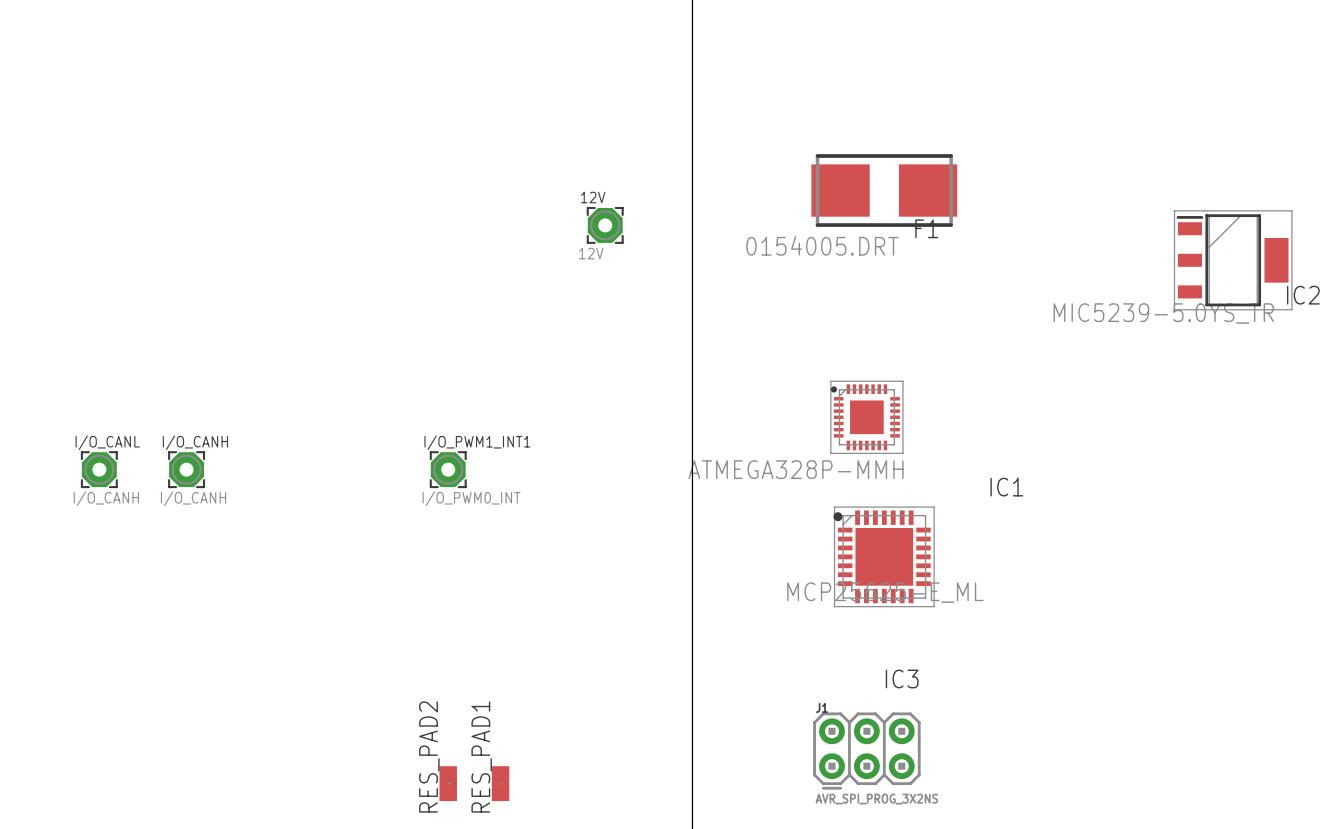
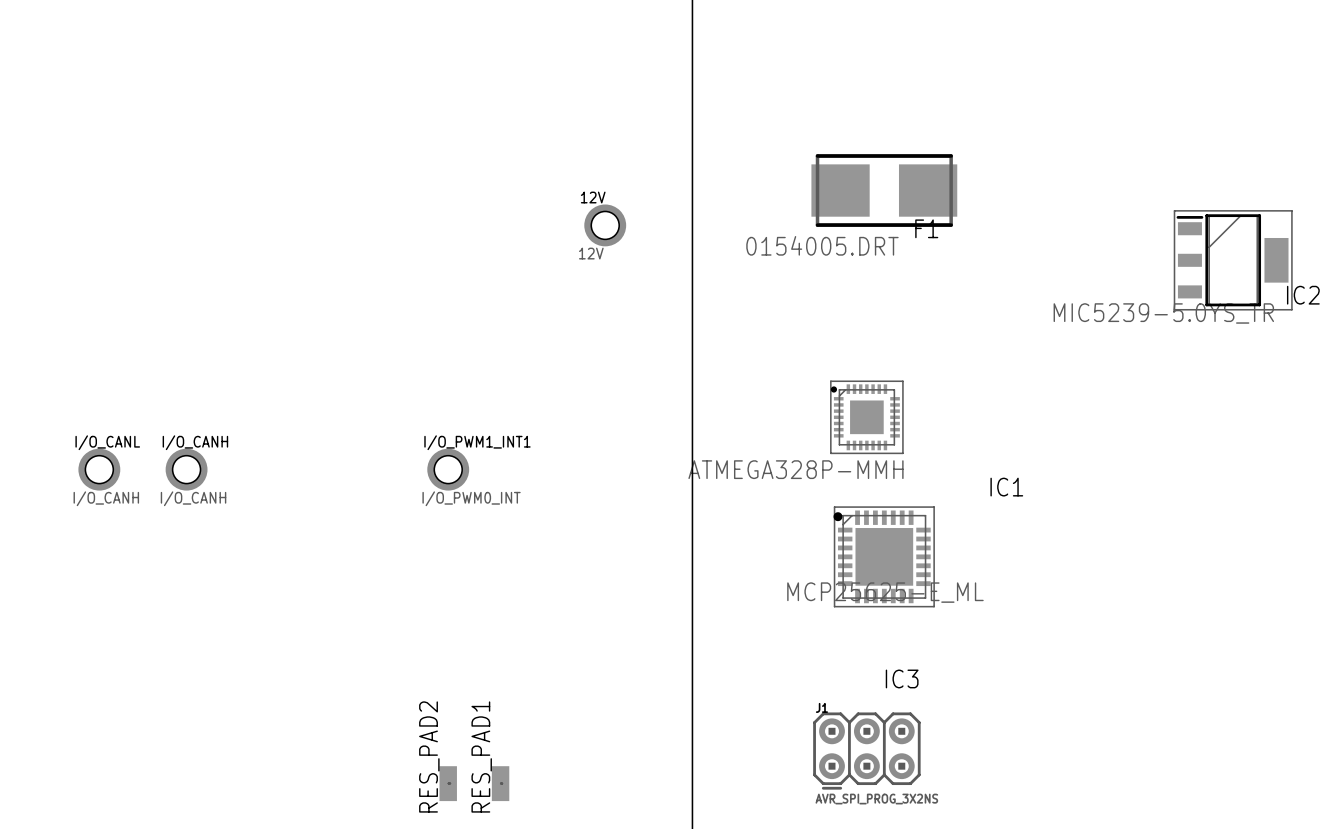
12V footprint: [586, 206, 624, 244] -> [584, 204, 627, 247]
I/O_CANL footprint: [80, 451, 118, 489] -> [78, 448, 121, 491]
I/O_CANH footprint: [168, 451, 206, 489] -> [165, 448, 208, 491]
I/O_PWM1_INT1 footprint: [429, 451, 467, 489] -> [427, 448, 470, 491]

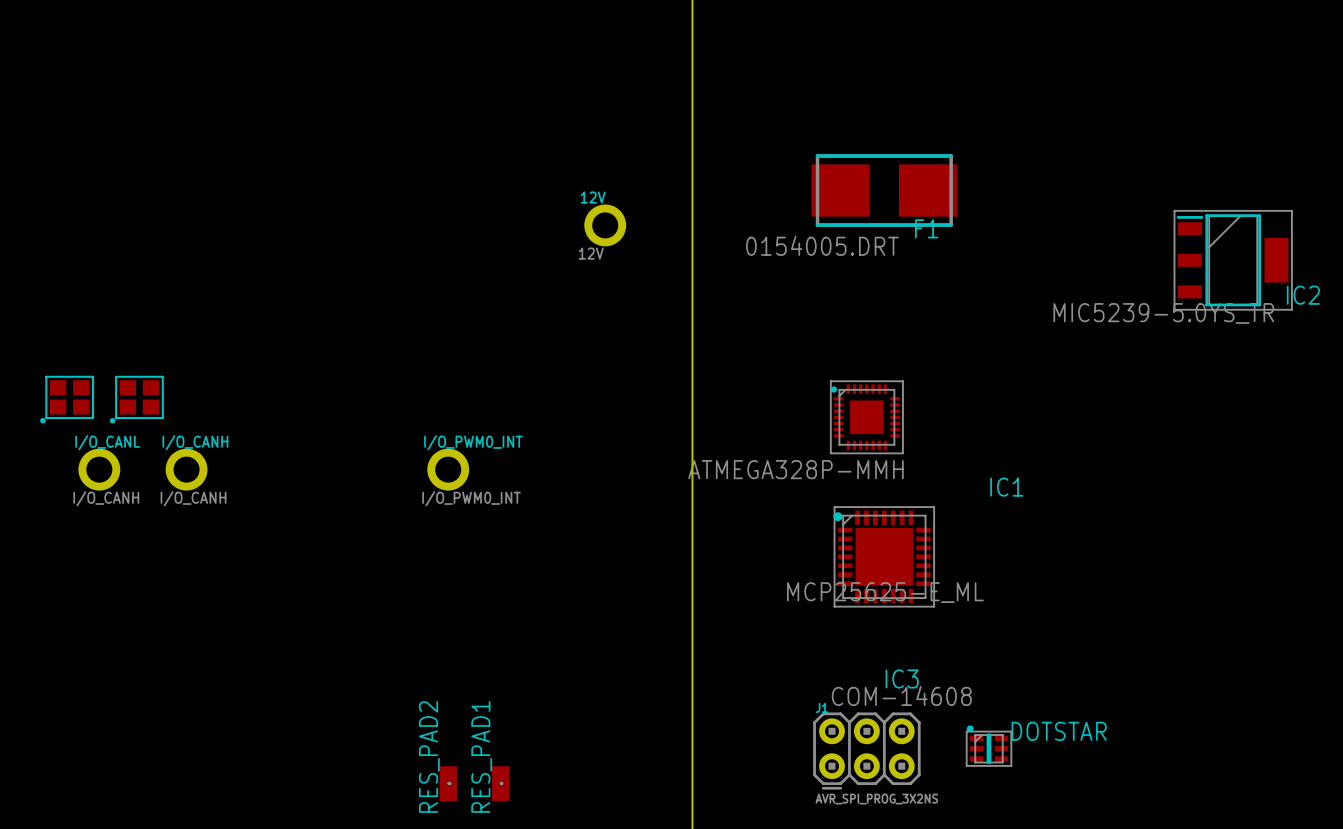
part: none -> (67, 399)
part: none -> (136, 399)
I/O_PWM1_INT1 name: I/O_PWM1_INT1 (477, 442) -> I/O_PWM0_INT (473, 442)
DOTSTAR: none -> COM-14608 (989, 745)

